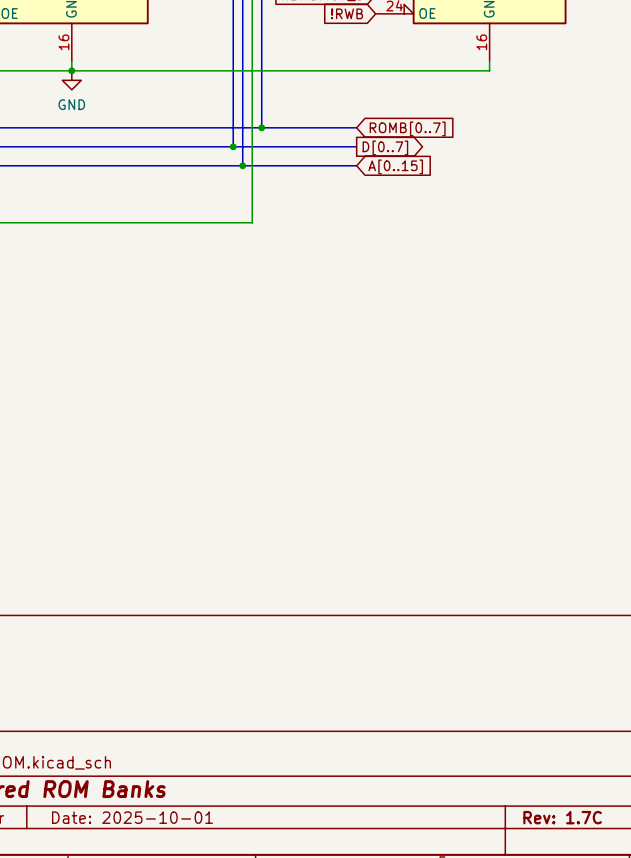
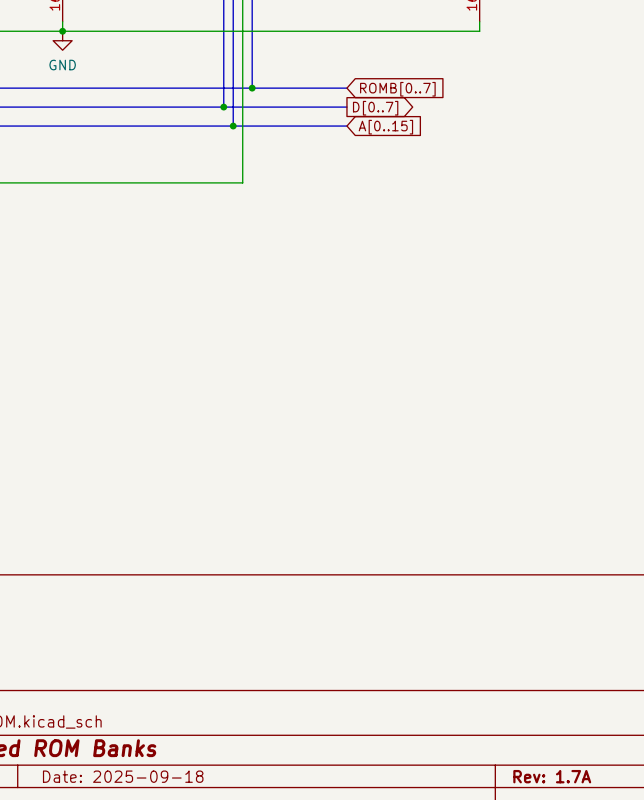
title block: Date: 2025-10-01 (132, 817) -> Date: 2025-09-18 (123, 776)
title block: Rev: 1.7C (562, 817) -> Rev: 1.7A (552, 776)

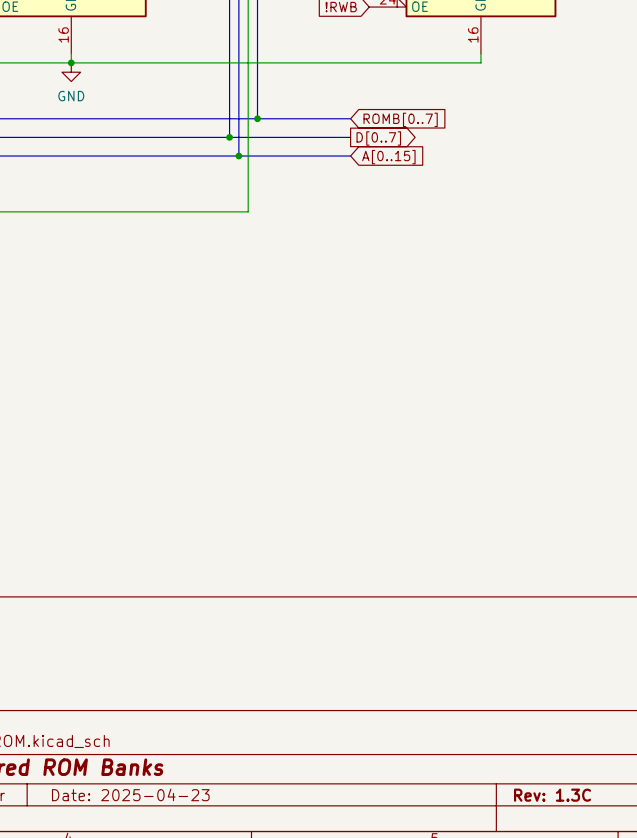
title block: Date: 2025-09-18 (123, 776) -> Date: 2025-04-23 (130, 794)
title block: Rev: 1.7A (552, 776) -> Rev: 1.3C (552, 795)

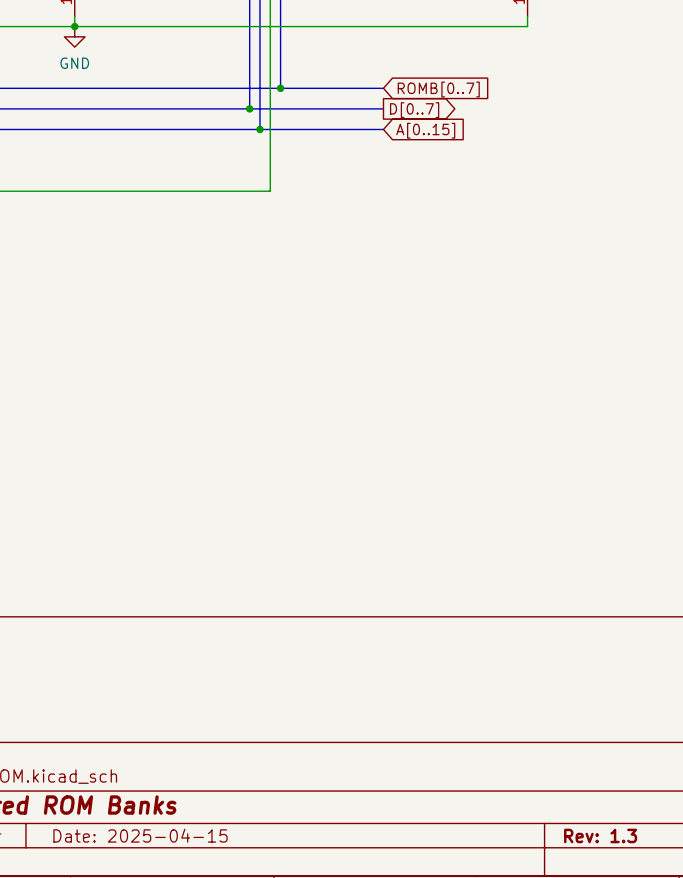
title block: Date: 2025-04-23 (130, 794) -> Date: 2025-04-15 (140, 835)
title block: Rev: 1.3C (552, 795) -> Rev: 1.3 (600, 835)

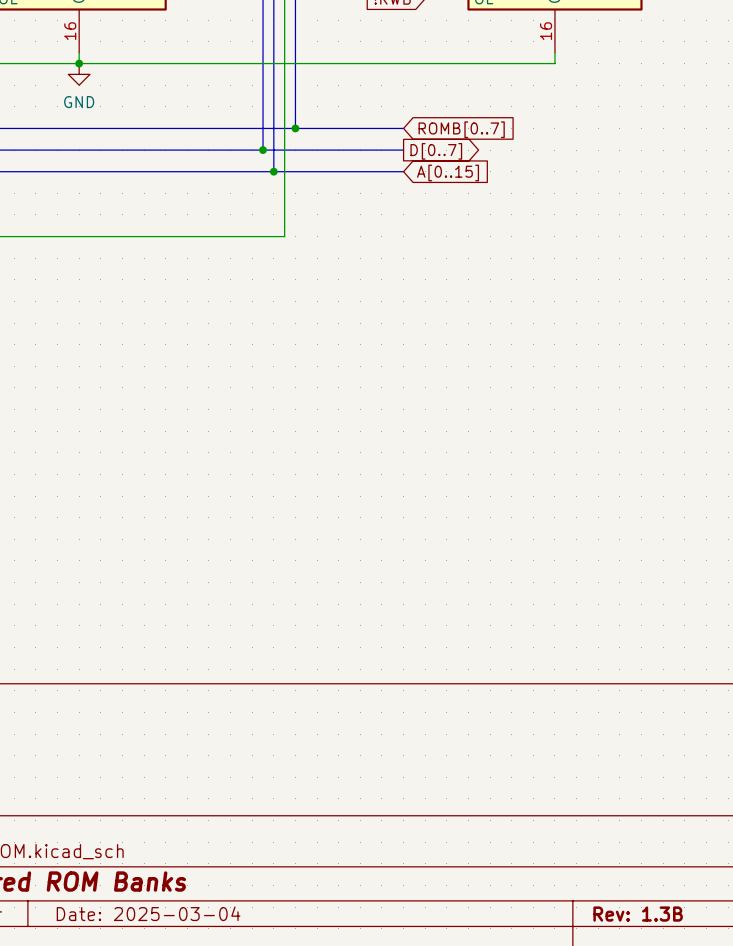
title block: Date: 2025-04-15 (140, 835) -> Date: 2025-03-04 (148, 913)
title block: Rev: 1.3 (600, 835) -> Rev: 1.3B (638, 914)

